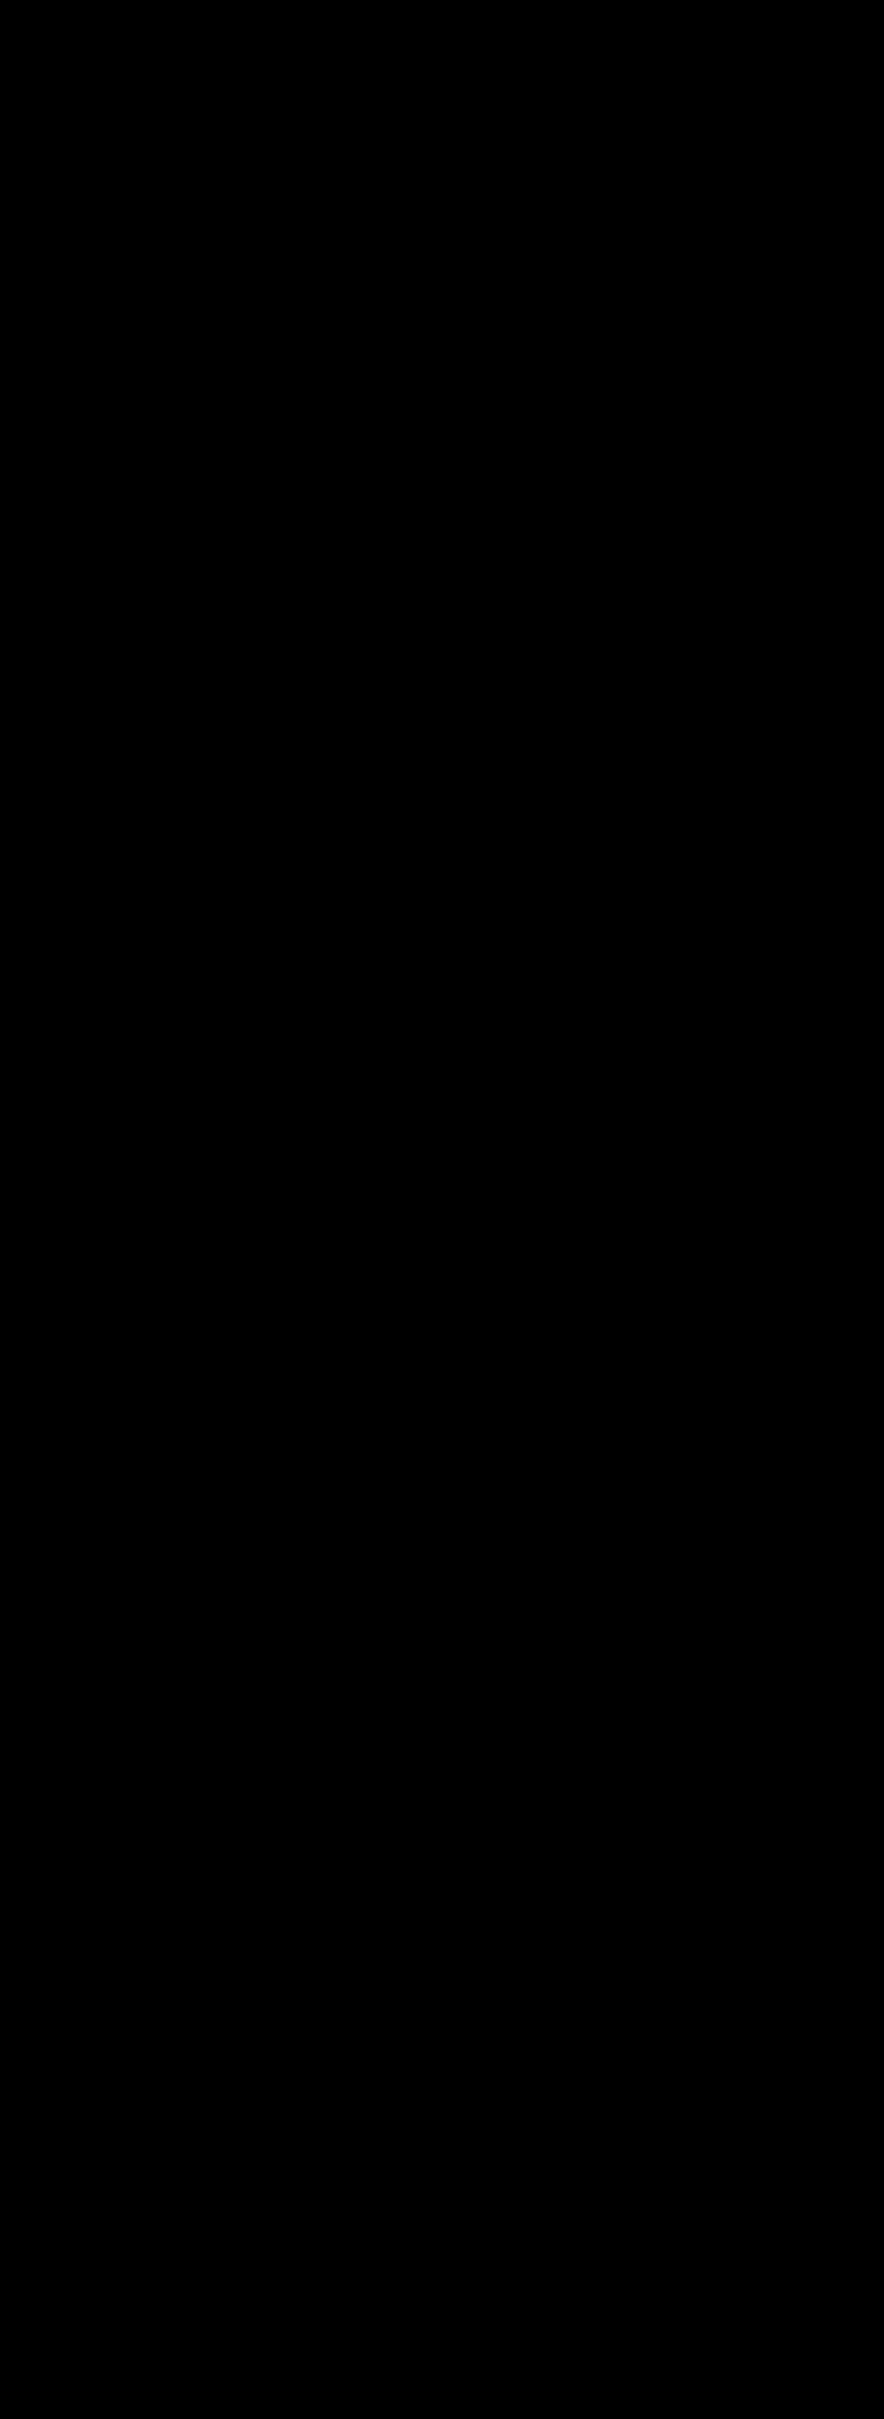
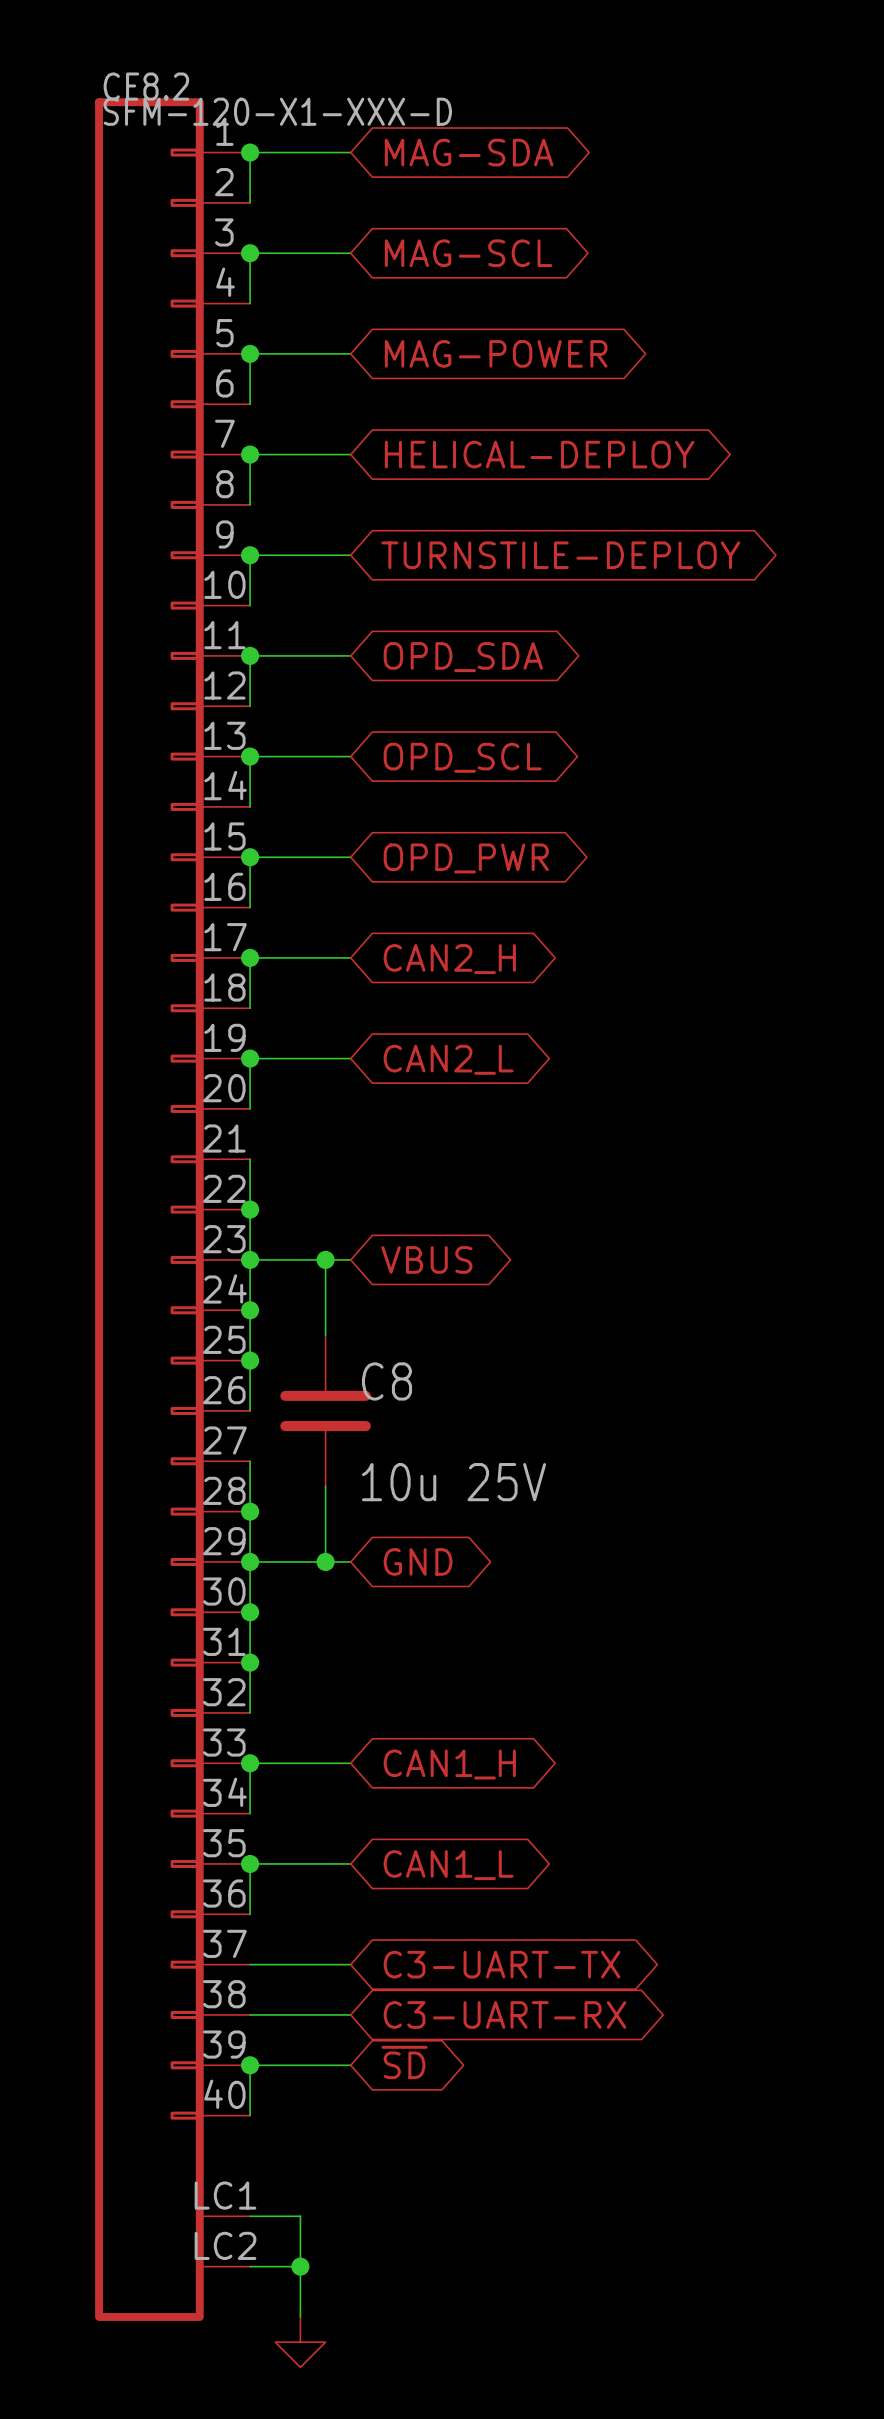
junction: none -> (250, 152)
wire: none -> (350, 152) (250, 152) (250, 202)
global label: none -> MAG-SDA (469, 152)
junction: none -> (250, 253)
wire: none -> (350, 253) (250, 253) (250, 303)
global label: none -> MAG-SCL (468, 253)
junction: none -> (250, 353)
wire: none -> (350, 353) (250, 353) (250, 404)
global label: none -> MAG-POWER (496, 353)
junction: none -> (250, 454)
wire: none -> (350, 454) (250, 454) (250, 504)
global label: none -> HELICAL-DEPLOY (539, 454)
junction: none -> (250, 555)
wire: none -> (350, 555) (250, 555) (250, 605)
global label: none -> TURNSTILE-DEPLOY (560, 555)
junction: none -> (250, 655)
wire: none -> (350, 655) (250, 655) (250, 706)
global label: none -> OPD_SDA (463, 657)
junction: none -> (250, 756)
wire: none -> (350, 756) (250, 756) (250, 806)
global label: none -> OPD_SCL (462, 757)
junction: none -> (250, 857)
wire: none -> (350, 857) (250, 857) (250, 907)
global label: none -> OPD_PWR (466, 858)
junction: none -> (250, 957)
wire: none -> (350, 957) (250, 957) (250, 1008)
global label: none -> CAN2_H (449, 959)
junction: none -> (250, 1058)
wire: none -> (350, 1058) (250, 1058) (250, 1108)
global label: none -> CAN2_L (448, 1059)
wire: none -> (250, 1159) (250, 1410)
CF8.2: none -> SFM-120-X1-XXX-D (172, 1209)
junction: none -> (250, 1209)
wire: none -> (250, 1259) (350, 1259)
junction: none -> (250, 1259)
wire: none -> (325, 1259) (325, 1335)
junction: none -> (325, 1259)
global label: none -> VBUS (426, 1259)
junction: none -> (250, 1310)
junction: none -> (250, 1360)
C8: none -> 10u 25V (325, 1410)
wire: none -> (250, 1461) (250, 1712)
wire: none -> (325, 1486) (325, 1561)
junction: none -> (250, 1511)
wire: none -> (250, 1561) (350, 1561)
junction: none -> (250, 1561)
junction: none -> (325, 1561)
global label: none -> GND (418, 1561)
junction: none -> (250, 1612)
junction: none -> (250, 1662)
junction: none -> (250, 1763)
wire: none -> (350, 1763) (250, 1763) (250, 1813)
global label: none -> CAN1_H (449, 1764)
junction: none -> (250, 1863)
wire: none -> (350, 1863) (250, 1863) (250, 1914)
global label: none -> CAN1_L (448, 1865)
wire: none -> (250, 1964) (350, 1964)
global label: none -> C3-UART-TX (502, 1964)
wire: none -> (250, 2014) (350, 2014)
global label: none -> C3-UART-RX (504, 2014)
global label: none -> ~{SD} (404, 2062)
junction: none -> (250, 2065)
wire: none -> (350, 2065) (250, 2065) (250, 2115)
wire: none -> (250, 2216) (300, 2216) (300, 2316)
wire: none -> (250, 2266) (300, 2266)
junction: none -> (300, 2266)
power symbol: none -> (300, 2342)

